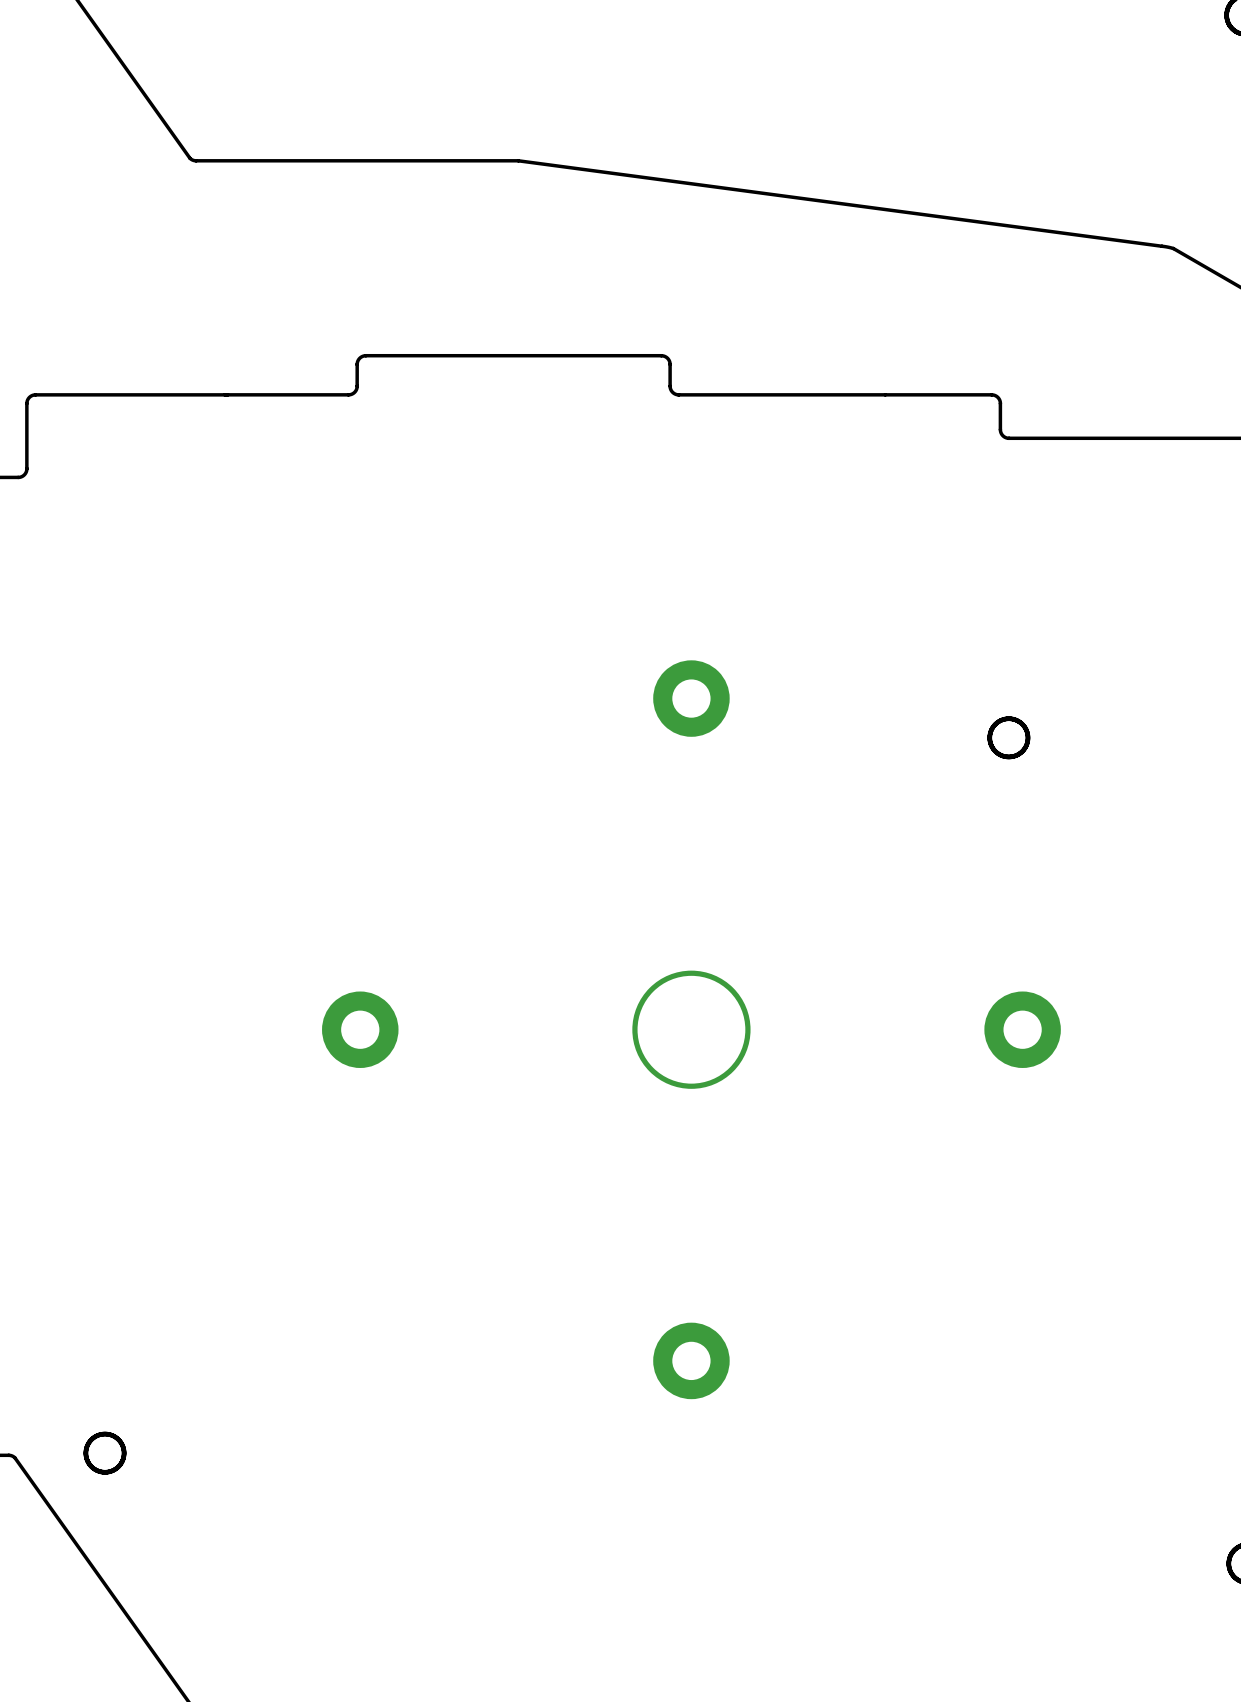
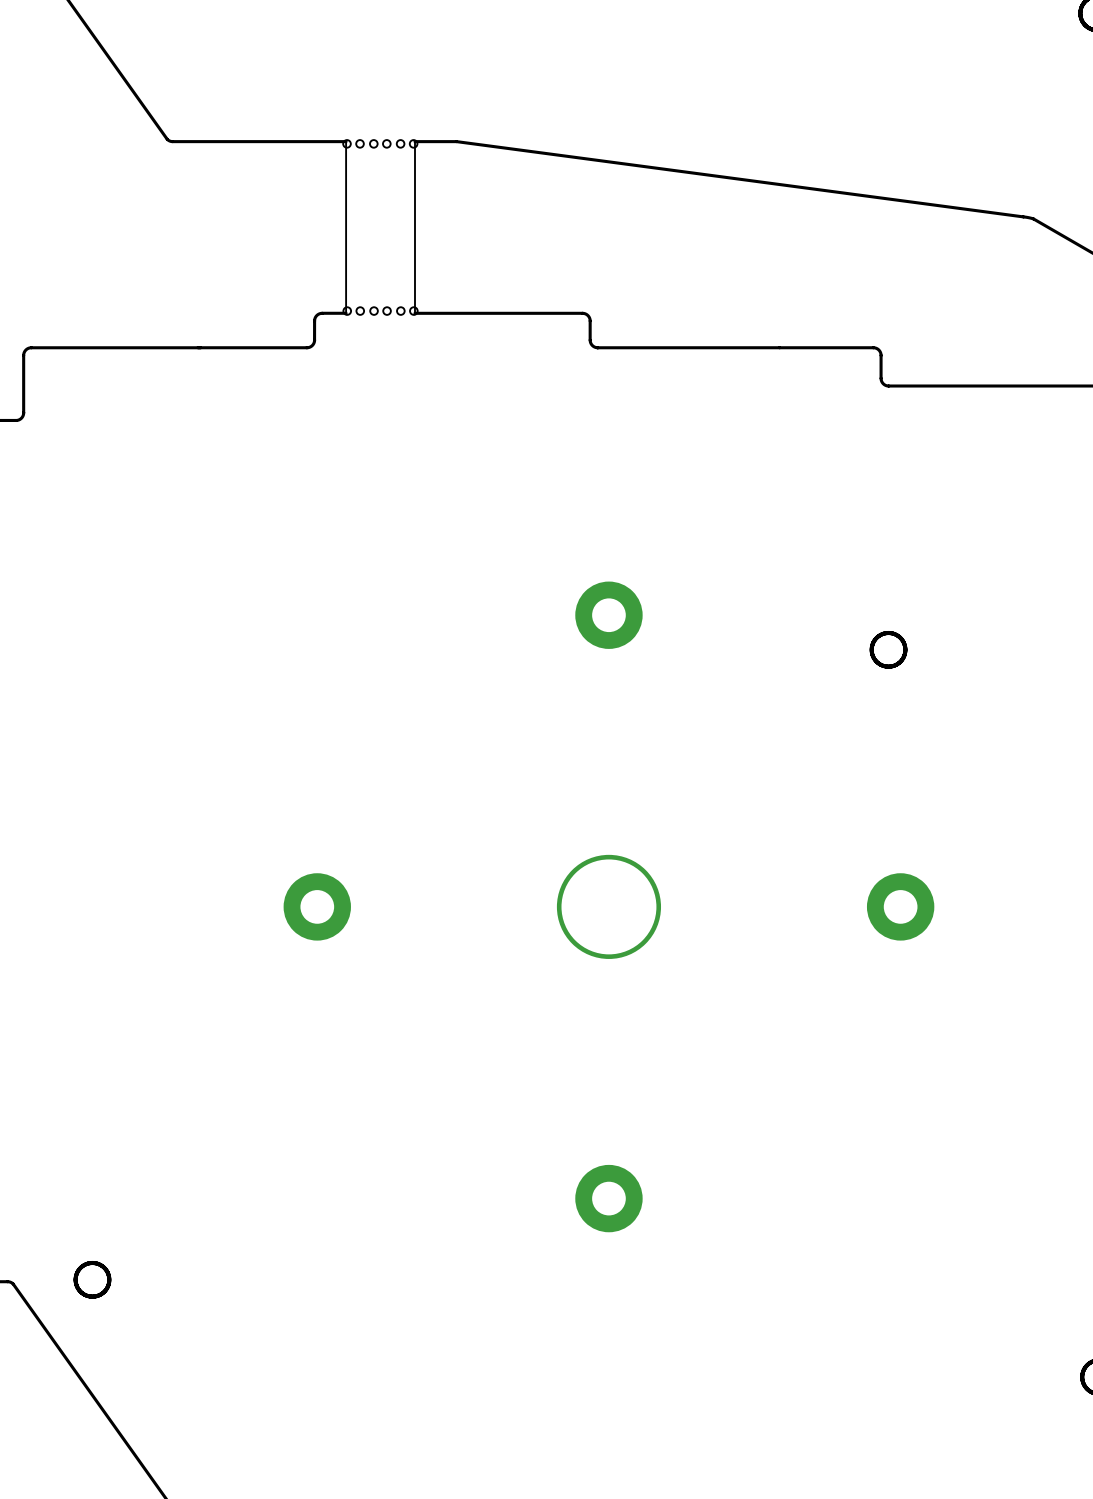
board edge: (392, 160) (471, 160) -> (414, 314) (414, 141)
board edge: none -> (346, 141) (346, 314)
part: none -> (353, 143)
part: none -> (380, 143)
part: none -> (407, 143)
part: none -> (353, 311)
part: none -> (380, 311)
part: none -> (407, 311)

